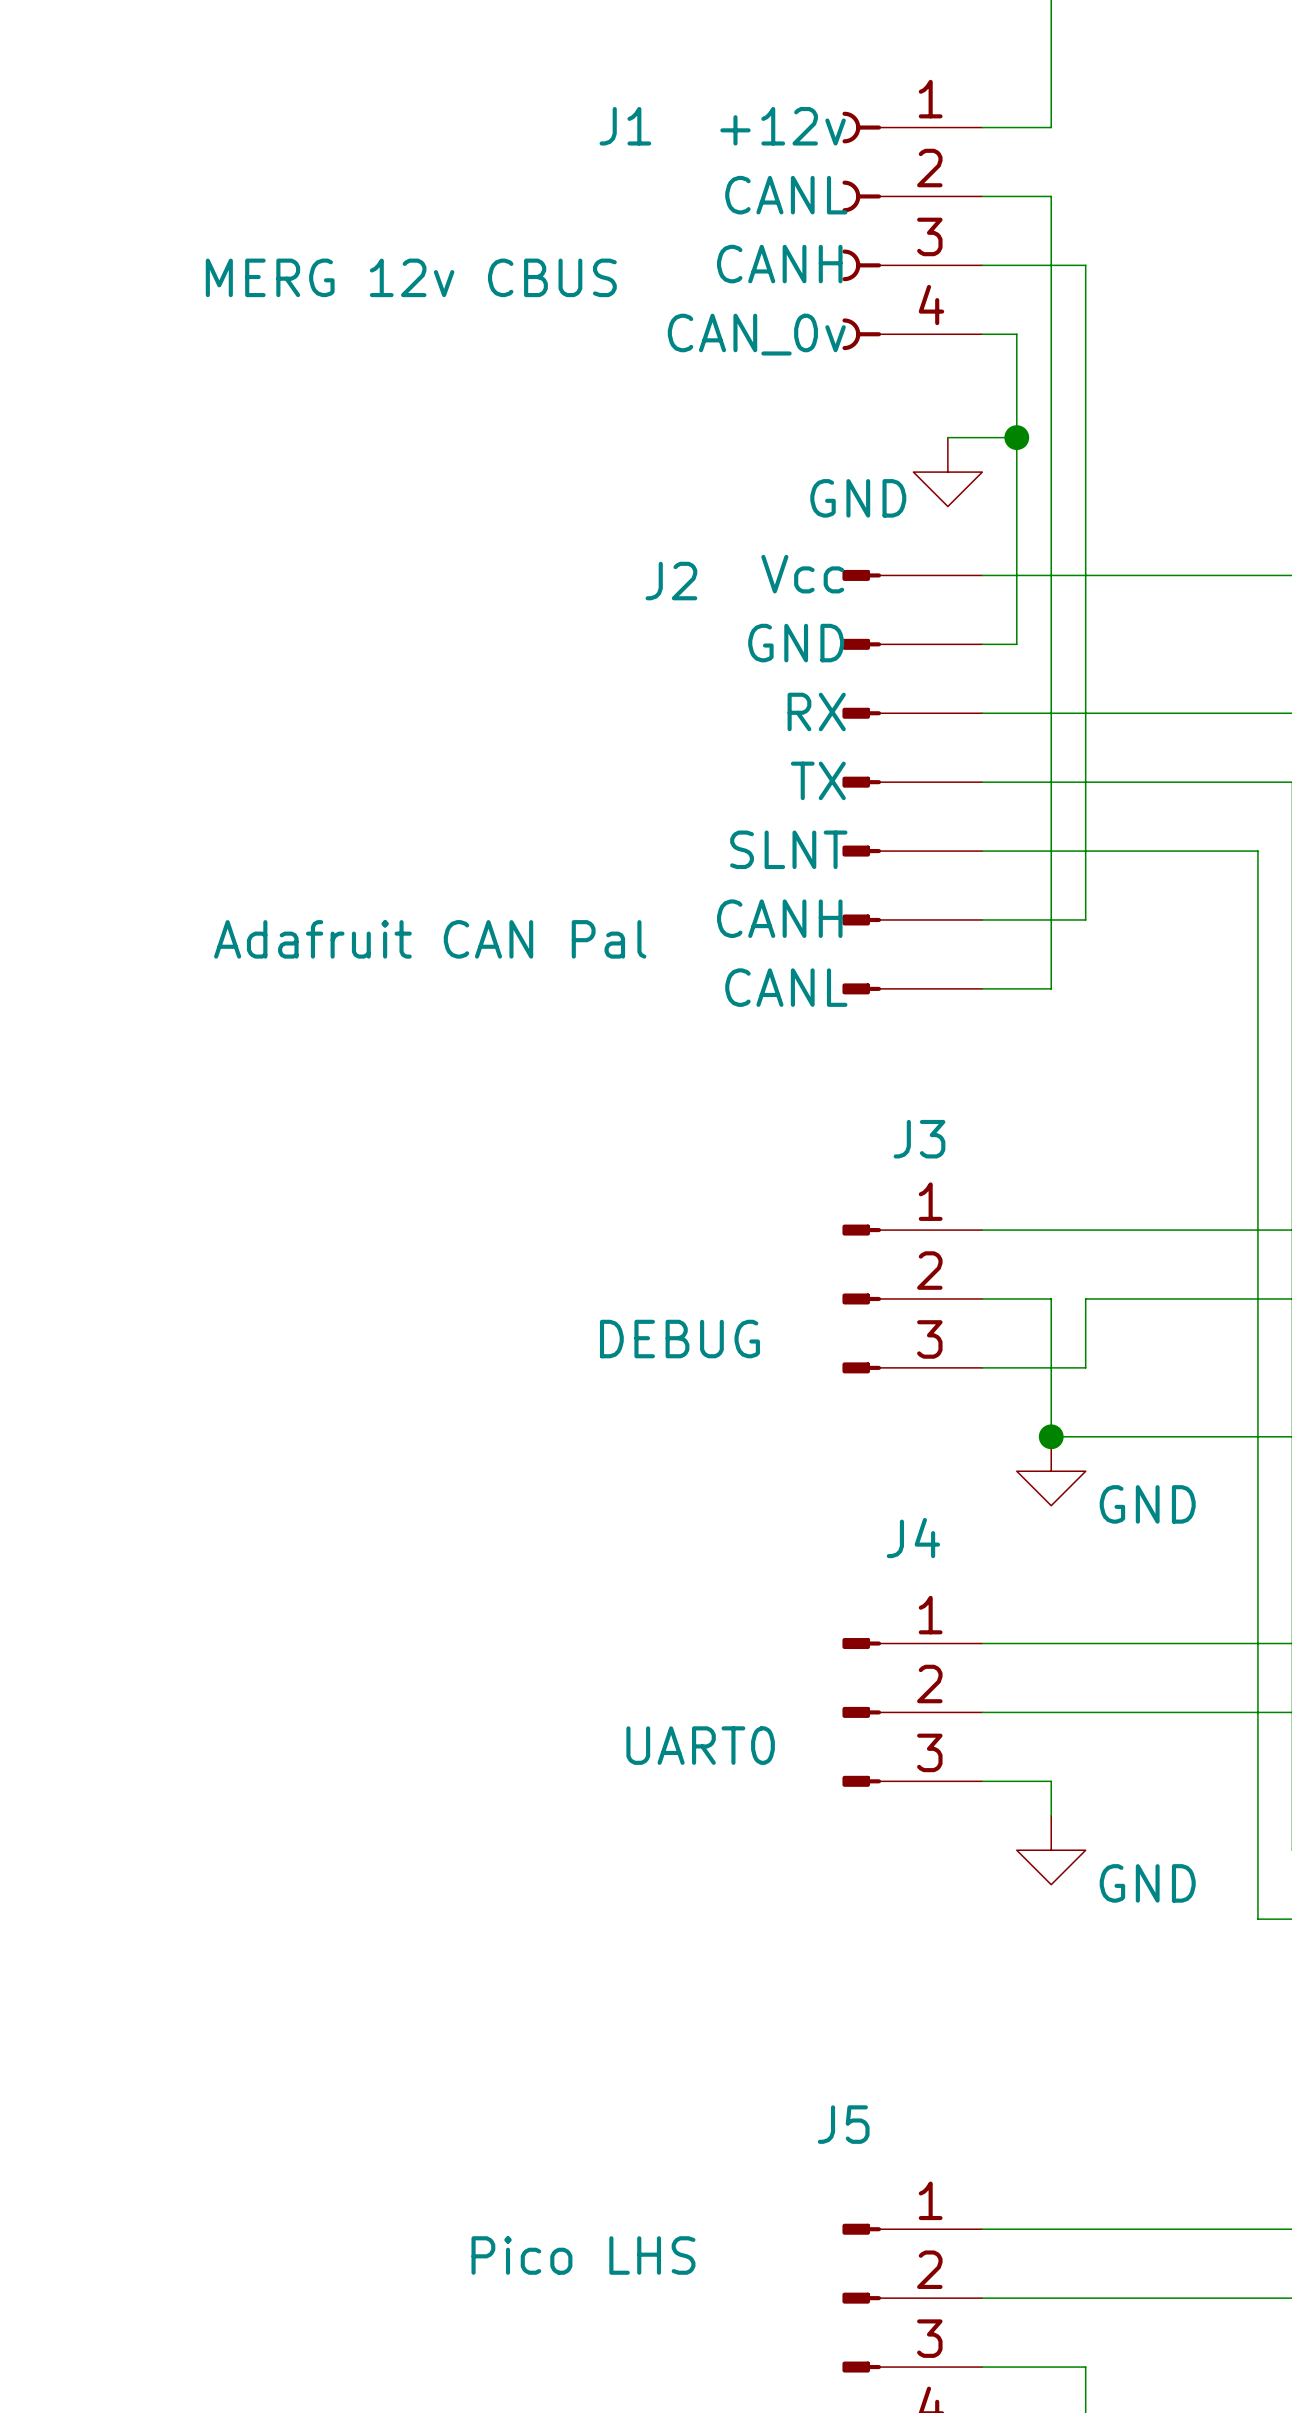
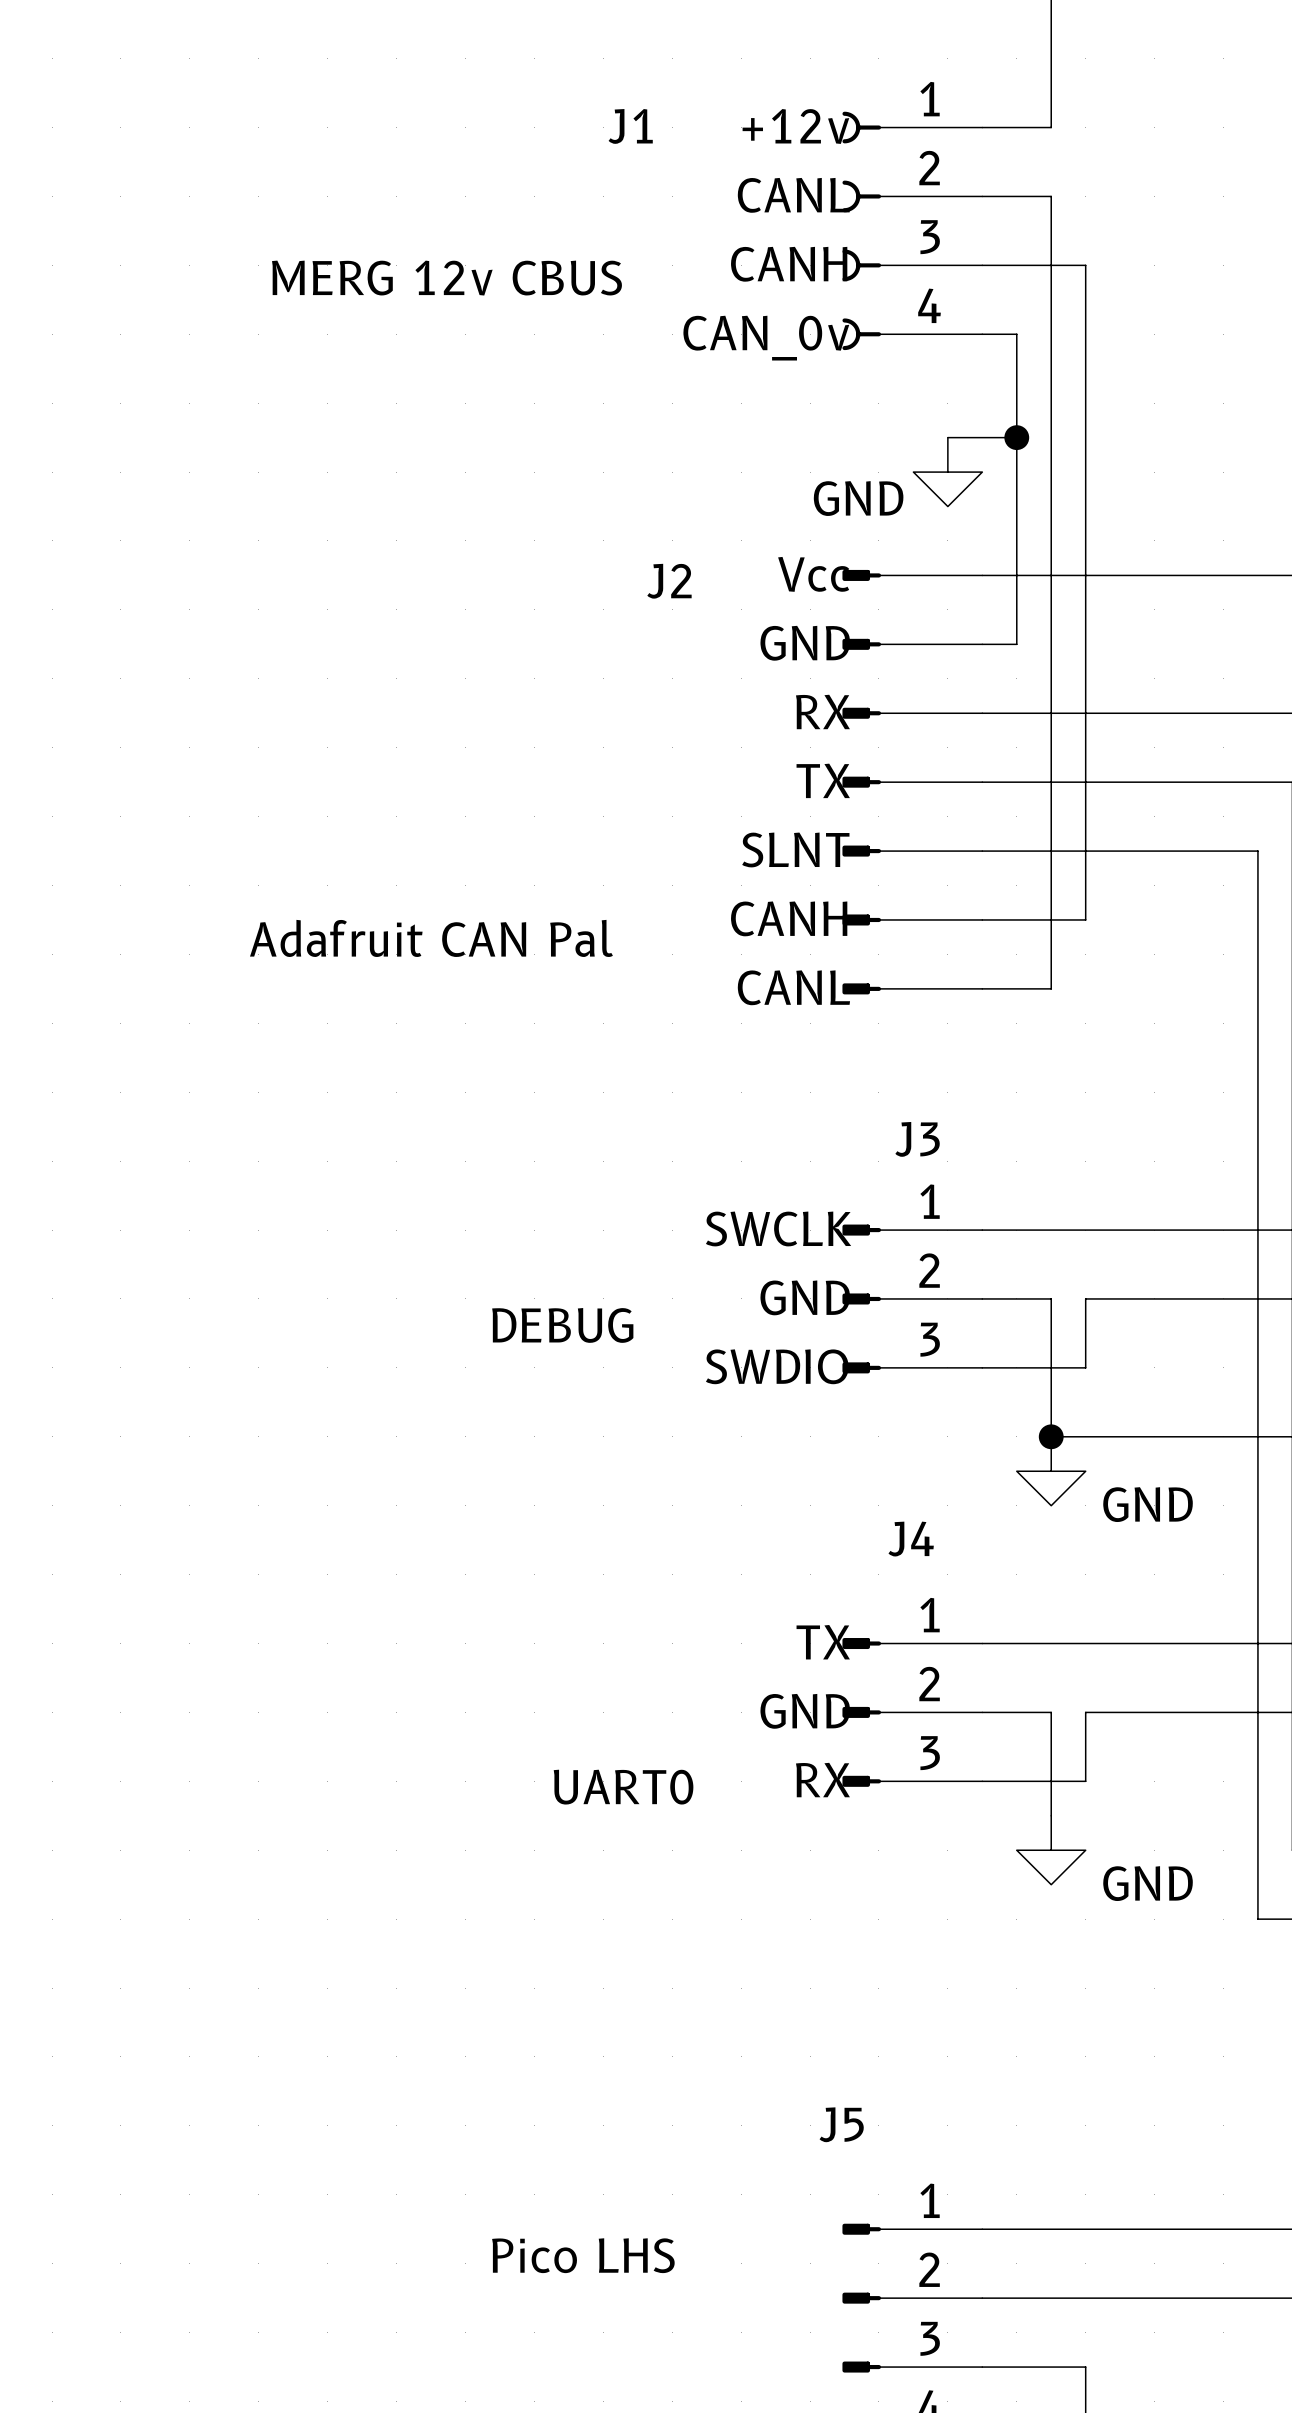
J3 pin name: none -> SWCLK (778, 1228)
J3 pin name: none -> GND (805, 1297)
J3 value position: DEBUG (679, 1339) -> DEBUG (562, 1325)
J3 pin name: none -> SWDIO (777, 1366)
J4 pin name: none -> TX (823, 1642)
J4 pin name: none -> GND (805, 1711)
wire: (1051, 1712) (1085, 1712) -> (1051, 1712) (1051, 1781) (1085, 1781) (1085, 1712)
J4 value position: UART0 (700, 1745) -> UART0 (623, 1787)
J4 pin name: none -> RX (822, 1780)

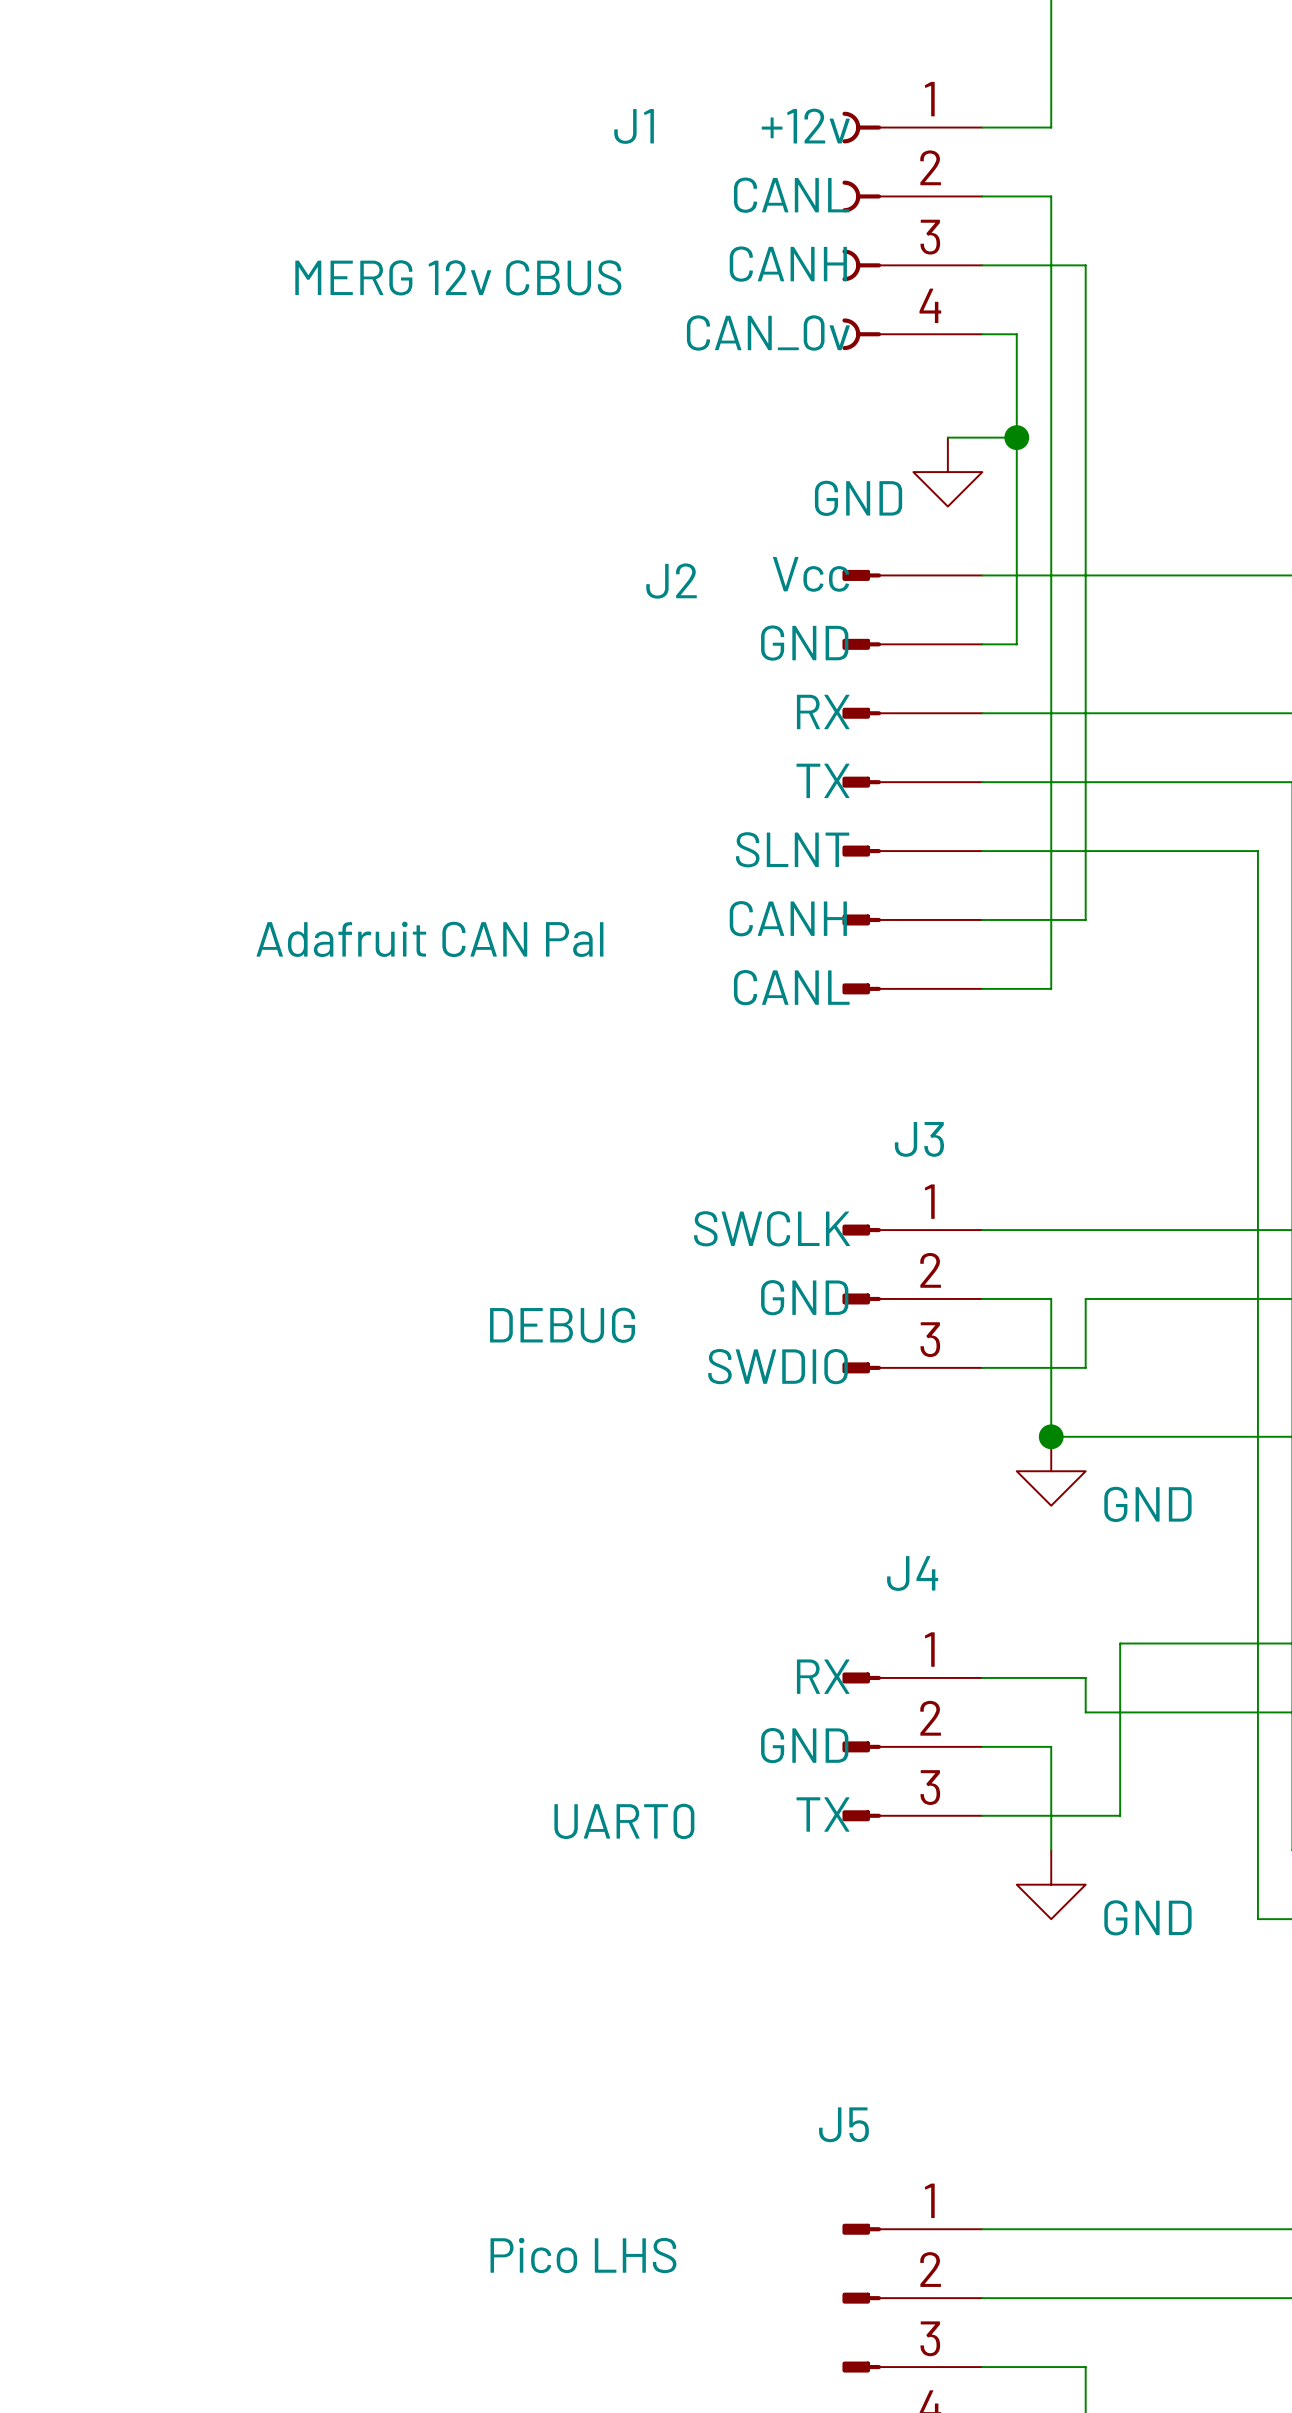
J4 pin name: TX (823, 1642) -> RX (823, 1676)
wire: (982, 1643) (1120, 1643) -> (982, 1815) (1120, 1815) (1120, 1643)
J4 position: (912, 1712) -> (912, 1746)
wire: (982, 1712) (1051, 1712) (1051, 1746) -> (982, 1746) (1051, 1746)
wire: (1085, 1712) (1085, 1781) (982, 1781) -> (1085, 1712) (1085, 1677) (982, 1677)
J4 pin name: RX (822, 1780) -> TX (823, 1814)
power symbol position: GND (1051, 1850) -> GND (1051, 1884)

